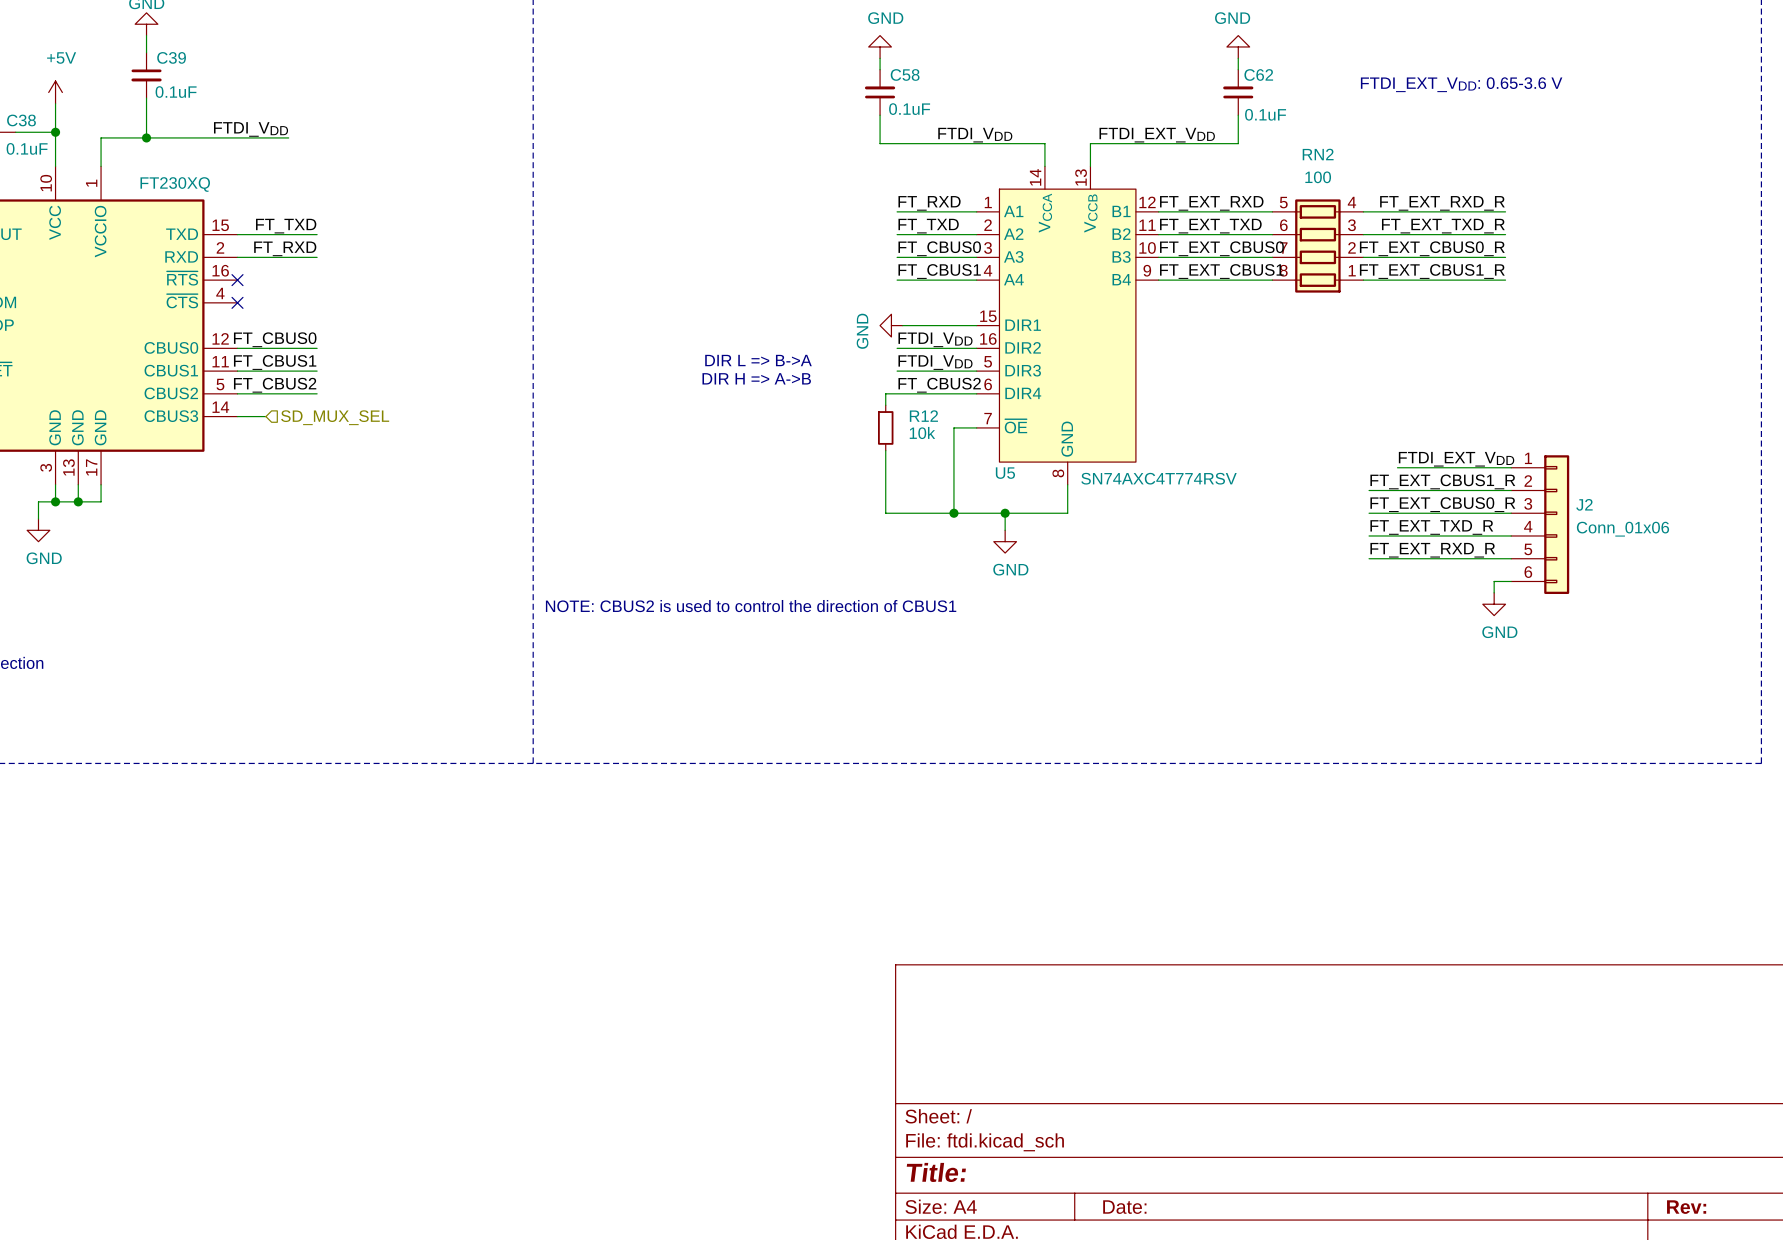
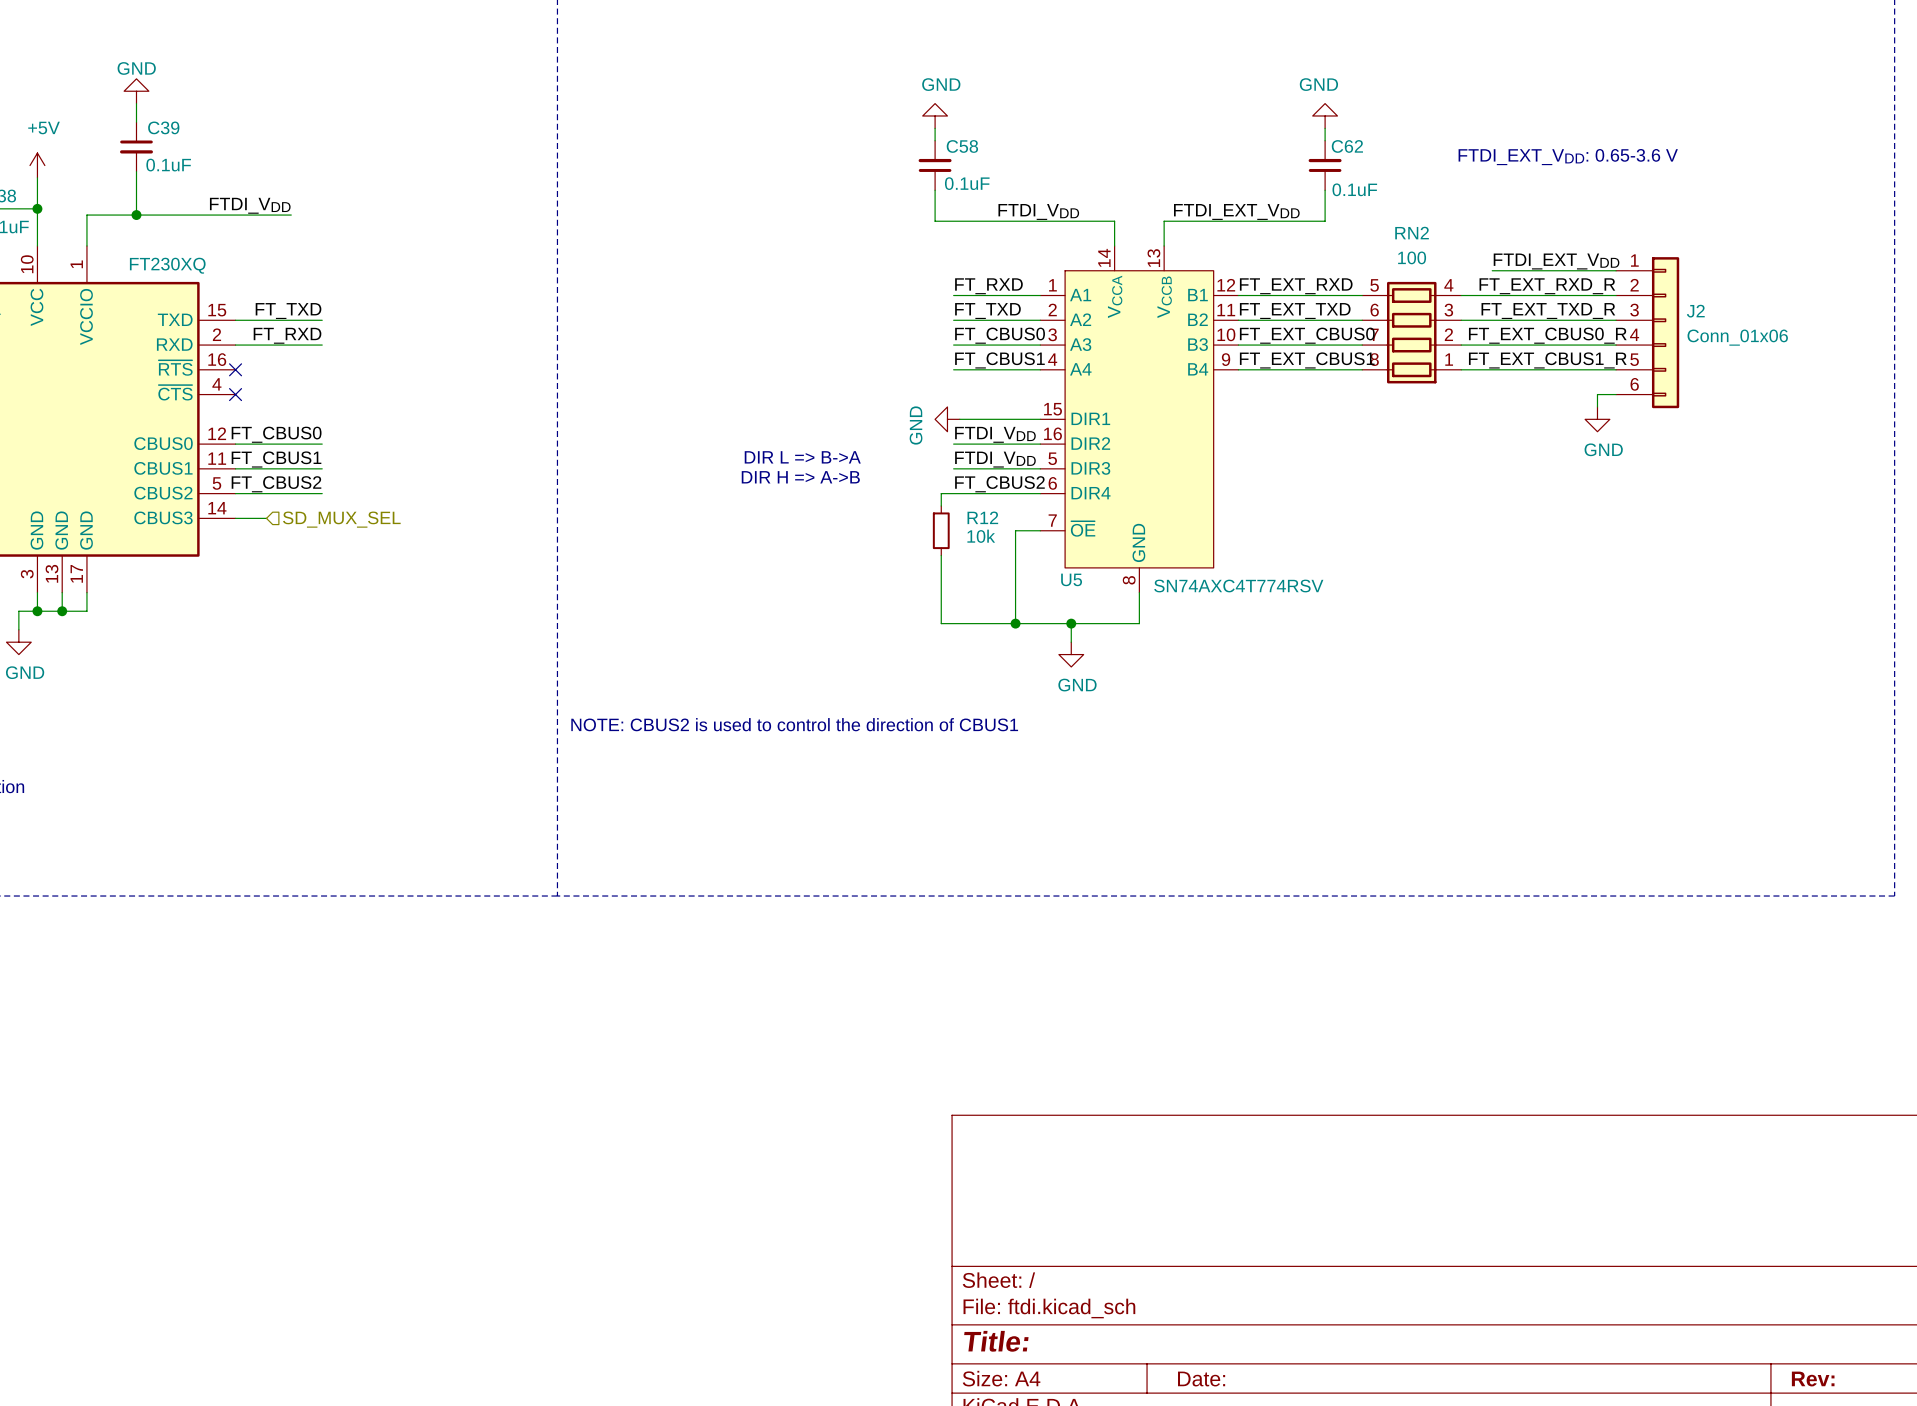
label: none -> FTDI_EXT_VDD (1556, 261)
wire: none -> (1492, 270) (1616, 270)
label: FT_EXT_CBUS0_R (1432, 248) -> none
label: none -> FT_EXT_CBUS0_R (1547, 335)
label: FT_EXT_CBUS1_R (1432, 271) -> none
label: none -> FT_EXT_CBUS1_R (1547, 360)
wire: none -> (1616, 394) (1597, 394) (1597, 406)
power symbol: none -> GND (1597, 419)
label: FTDI_EXT_VDD (1456, 459) -> none
wire: (1397, 467) (1511, 467) -> none
label: FT_EXT_CBUS1_R (1442, 481) -> none
wire: (1369, 490) (1511, 490) -> none
label: FT_EXT_CBUS0_R (1442, 504) -> none
wire: (1369, 513) (1511, 513) -> none
J2 position: (1540, 524) -> (1647, 332)
label: FT_EXT_TXD_R (1431, 527) -> none
wire: (1369, 535) (1511, 535) -> none
label: FT_EXT_RXD_R (1432, 550) -> none
wire: (1369, 558) (1511, 558) -> none
wire: (1511, 581) (1494, 581) (1494, 592) -> none
power symbol: GND (1494, 604) -> none

